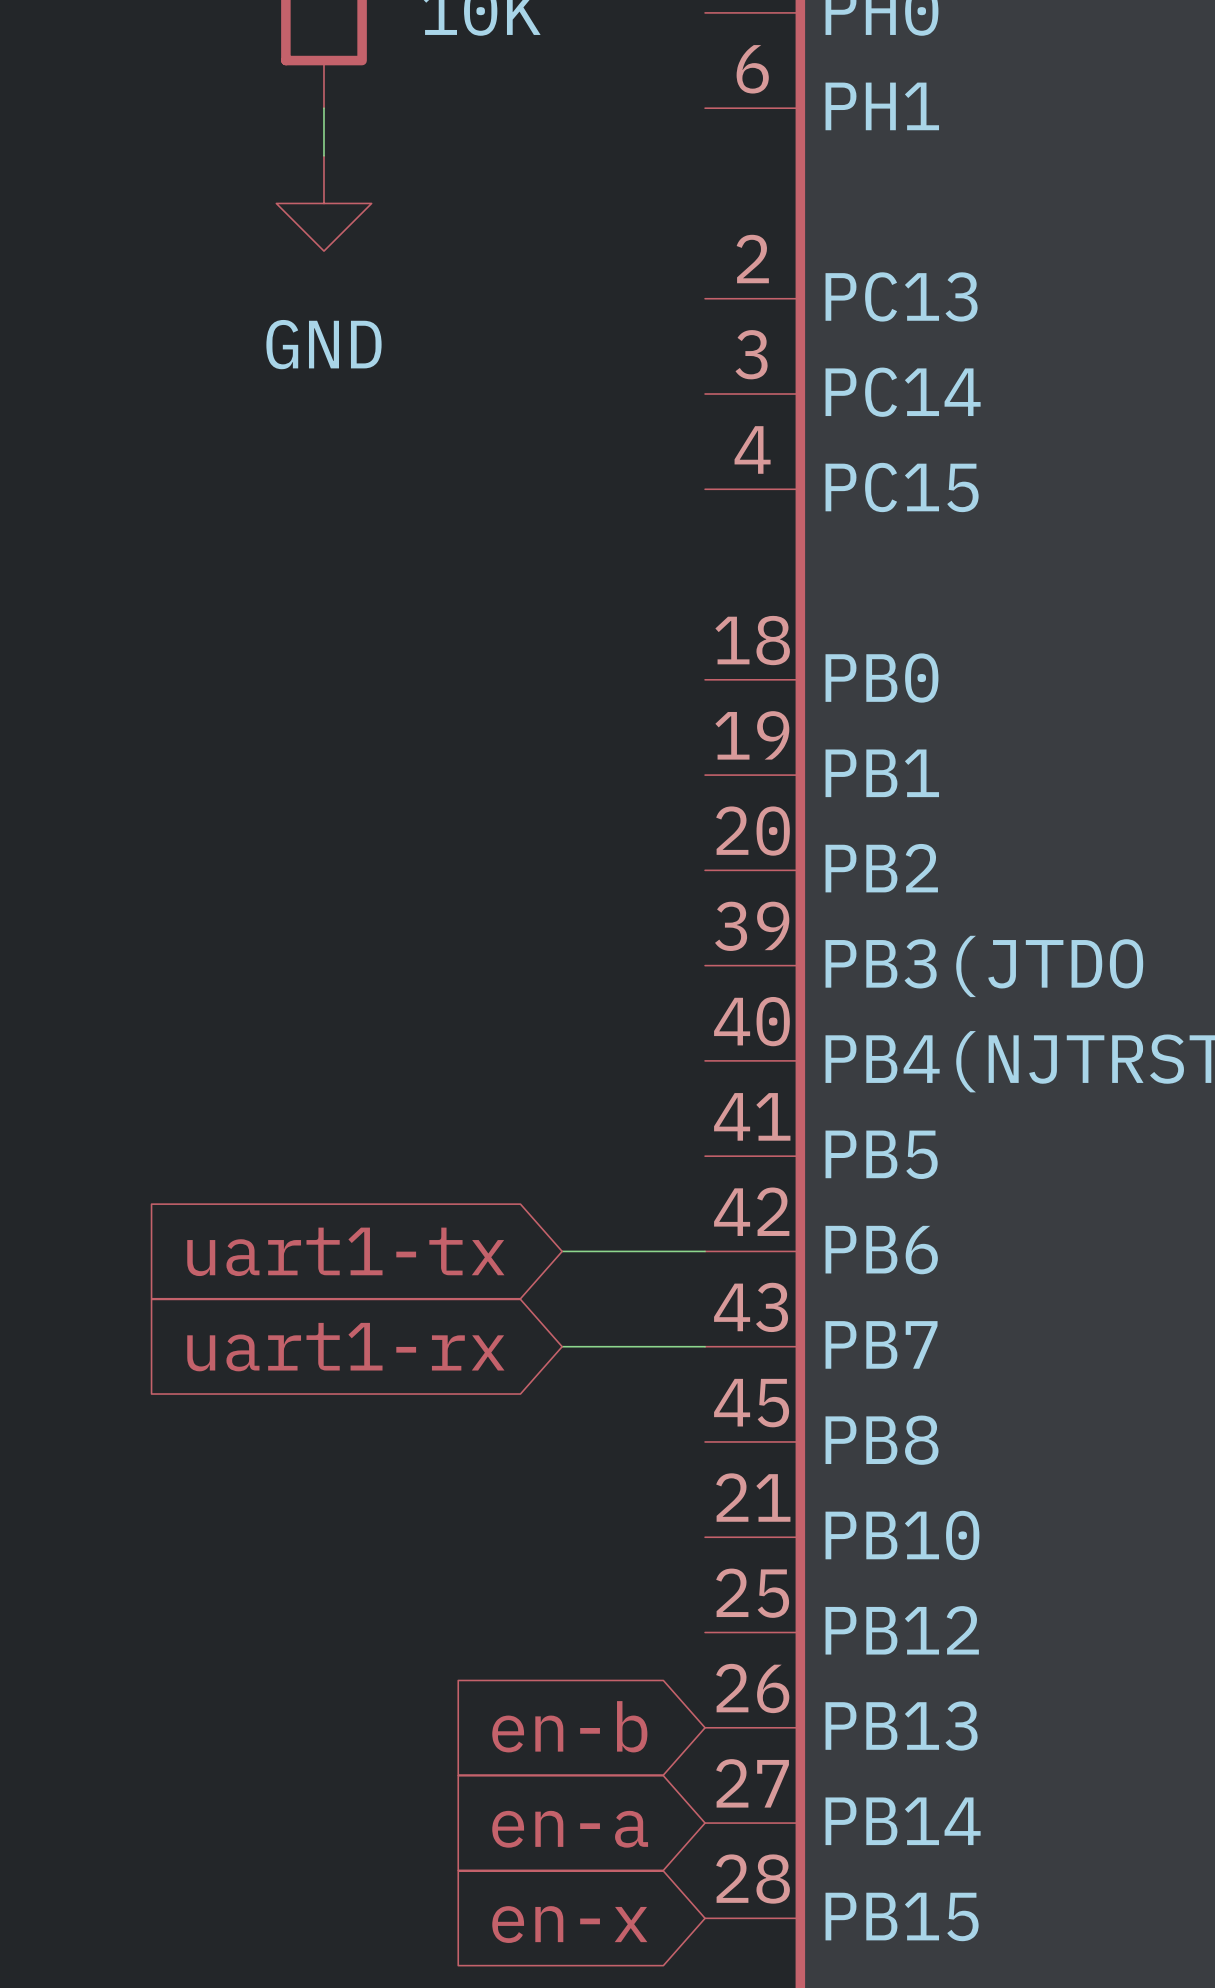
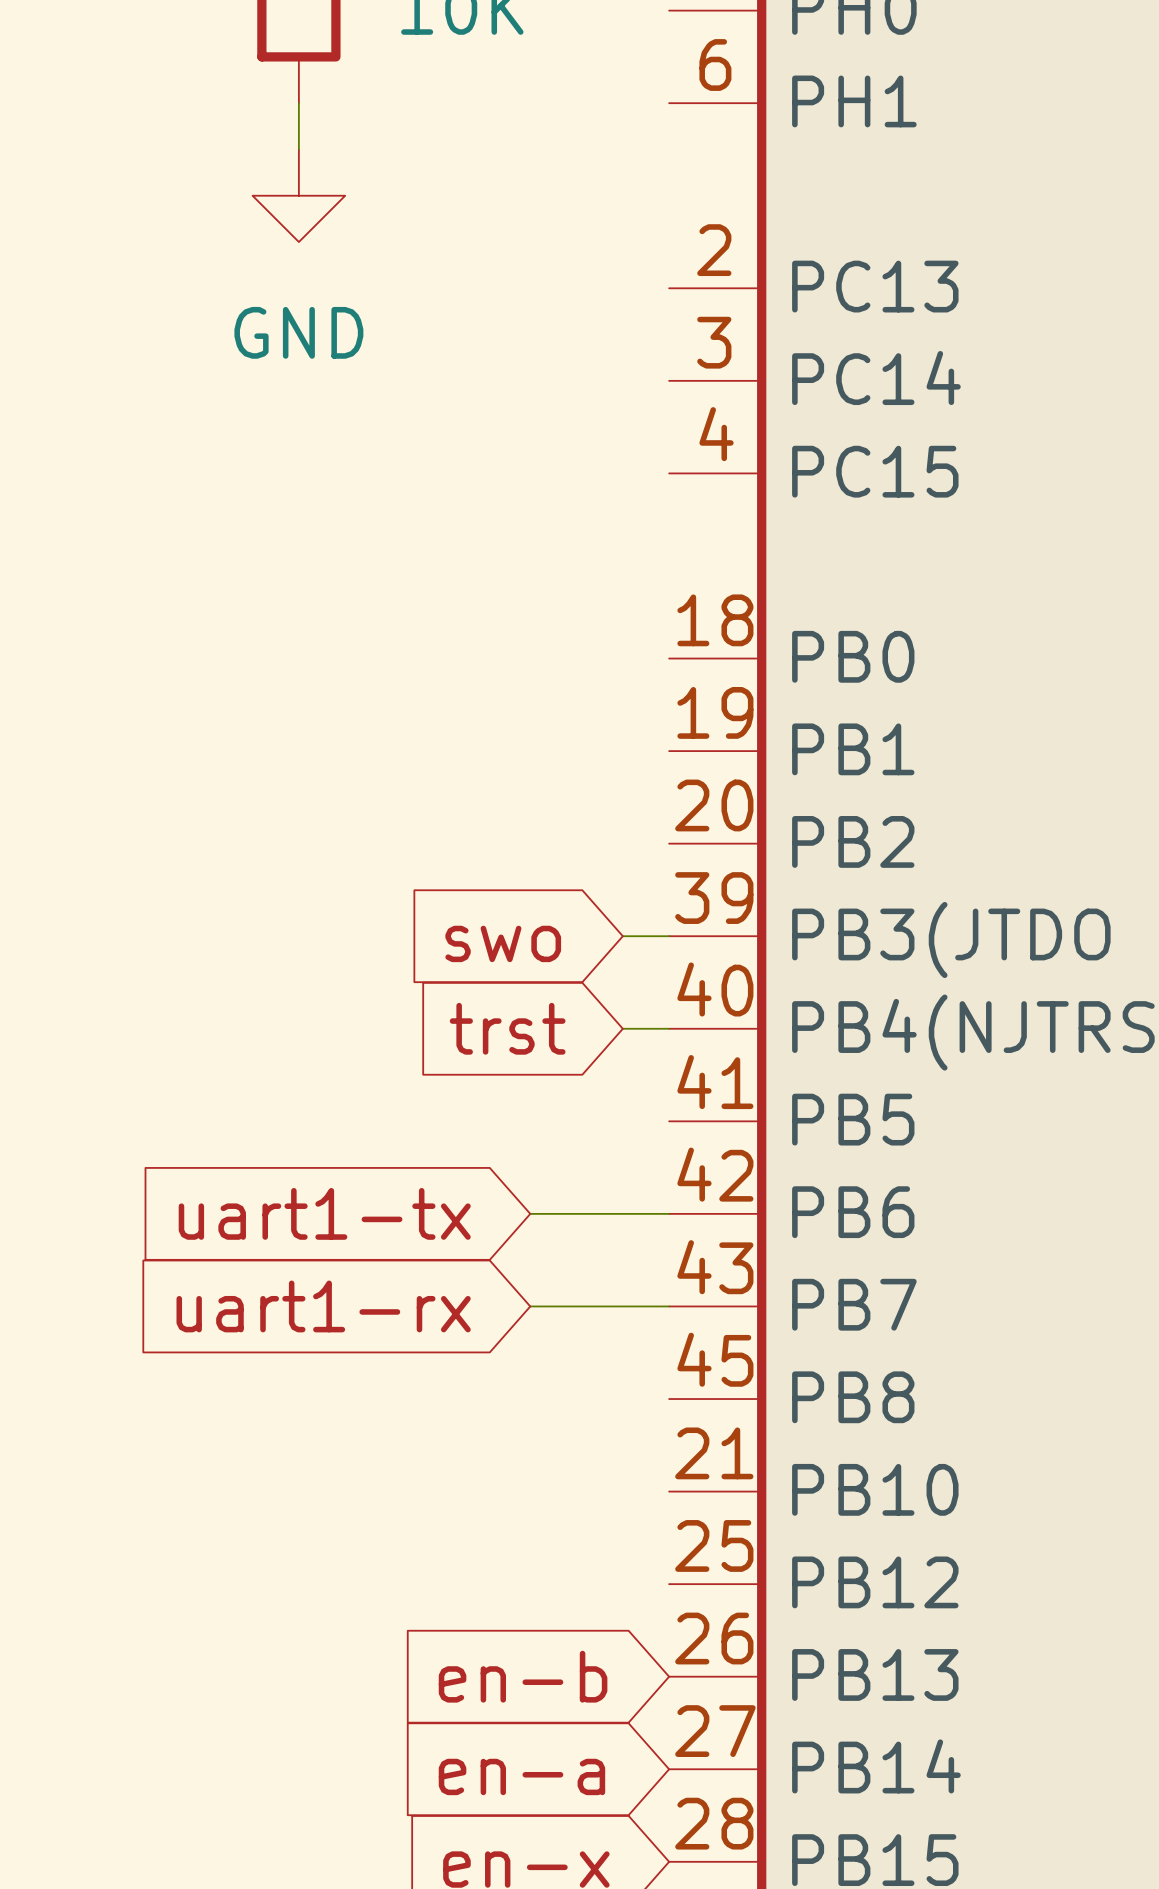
wire: none -> (622, 936) (669, 936)
global label: none -> swo (503, 943)
wire: none -> (622, 1028) (669, 1028)
global label: none -> trst (507, 1028)

